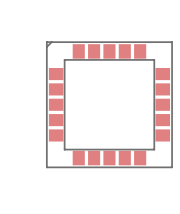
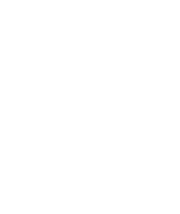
part: (109, 104) -> none

